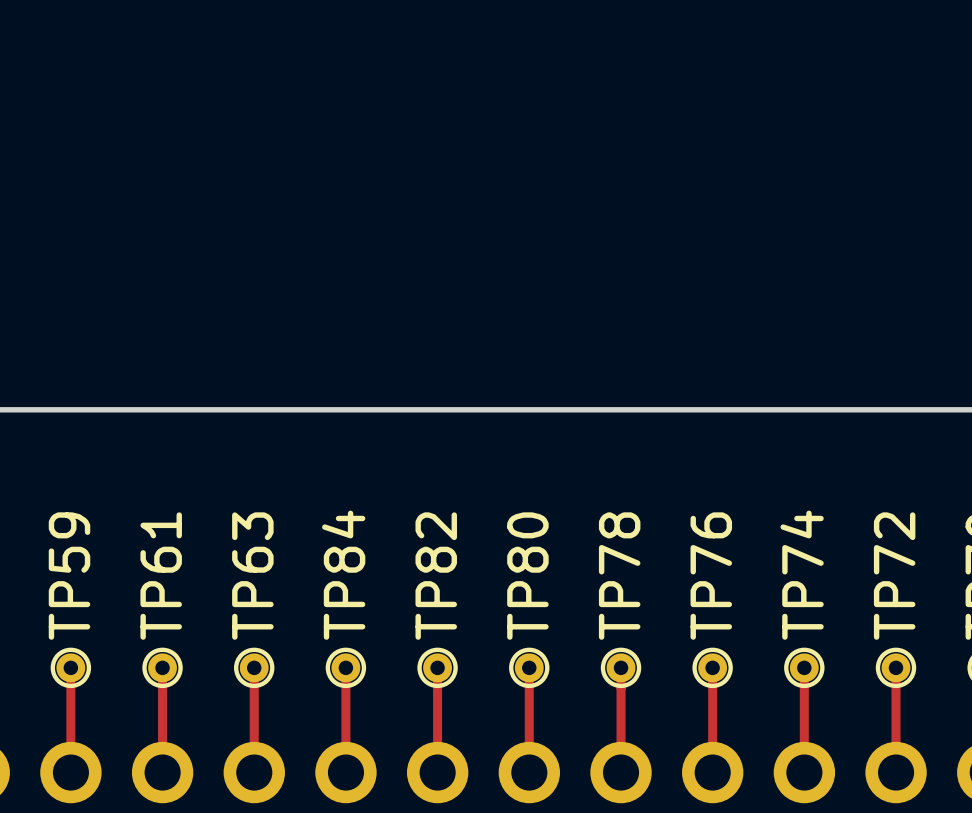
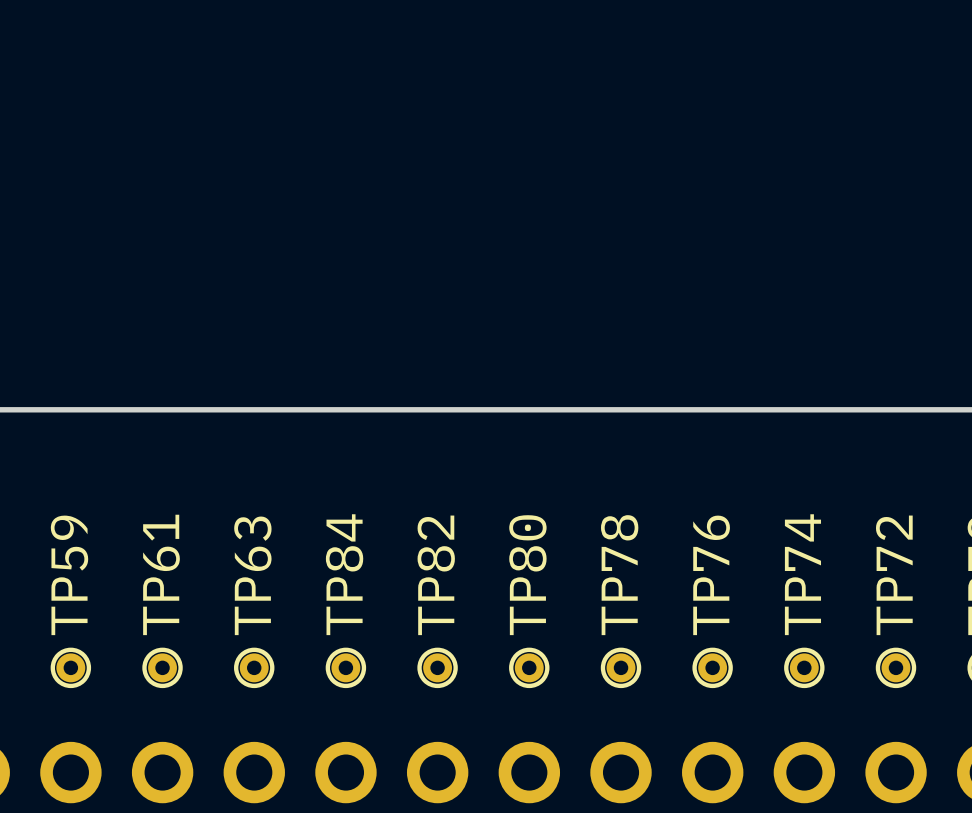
track: (70, 667) (70, 772) -> none
track: (162, 667) (162, 772) -> none
track: (254, 667) (254, 772) -> none
track: (345, 667) (345, 772) -> none
track: (437, 667) (437, 772) -> none
track: (529, 667) (529, 772) -> none
track: (621, 667) (621, 772) -> none
track: (712, 667) (712, 772) -> none
track: (804, 667) (804, 772) -> none
track: (895, 667) (895, 772) -> none

